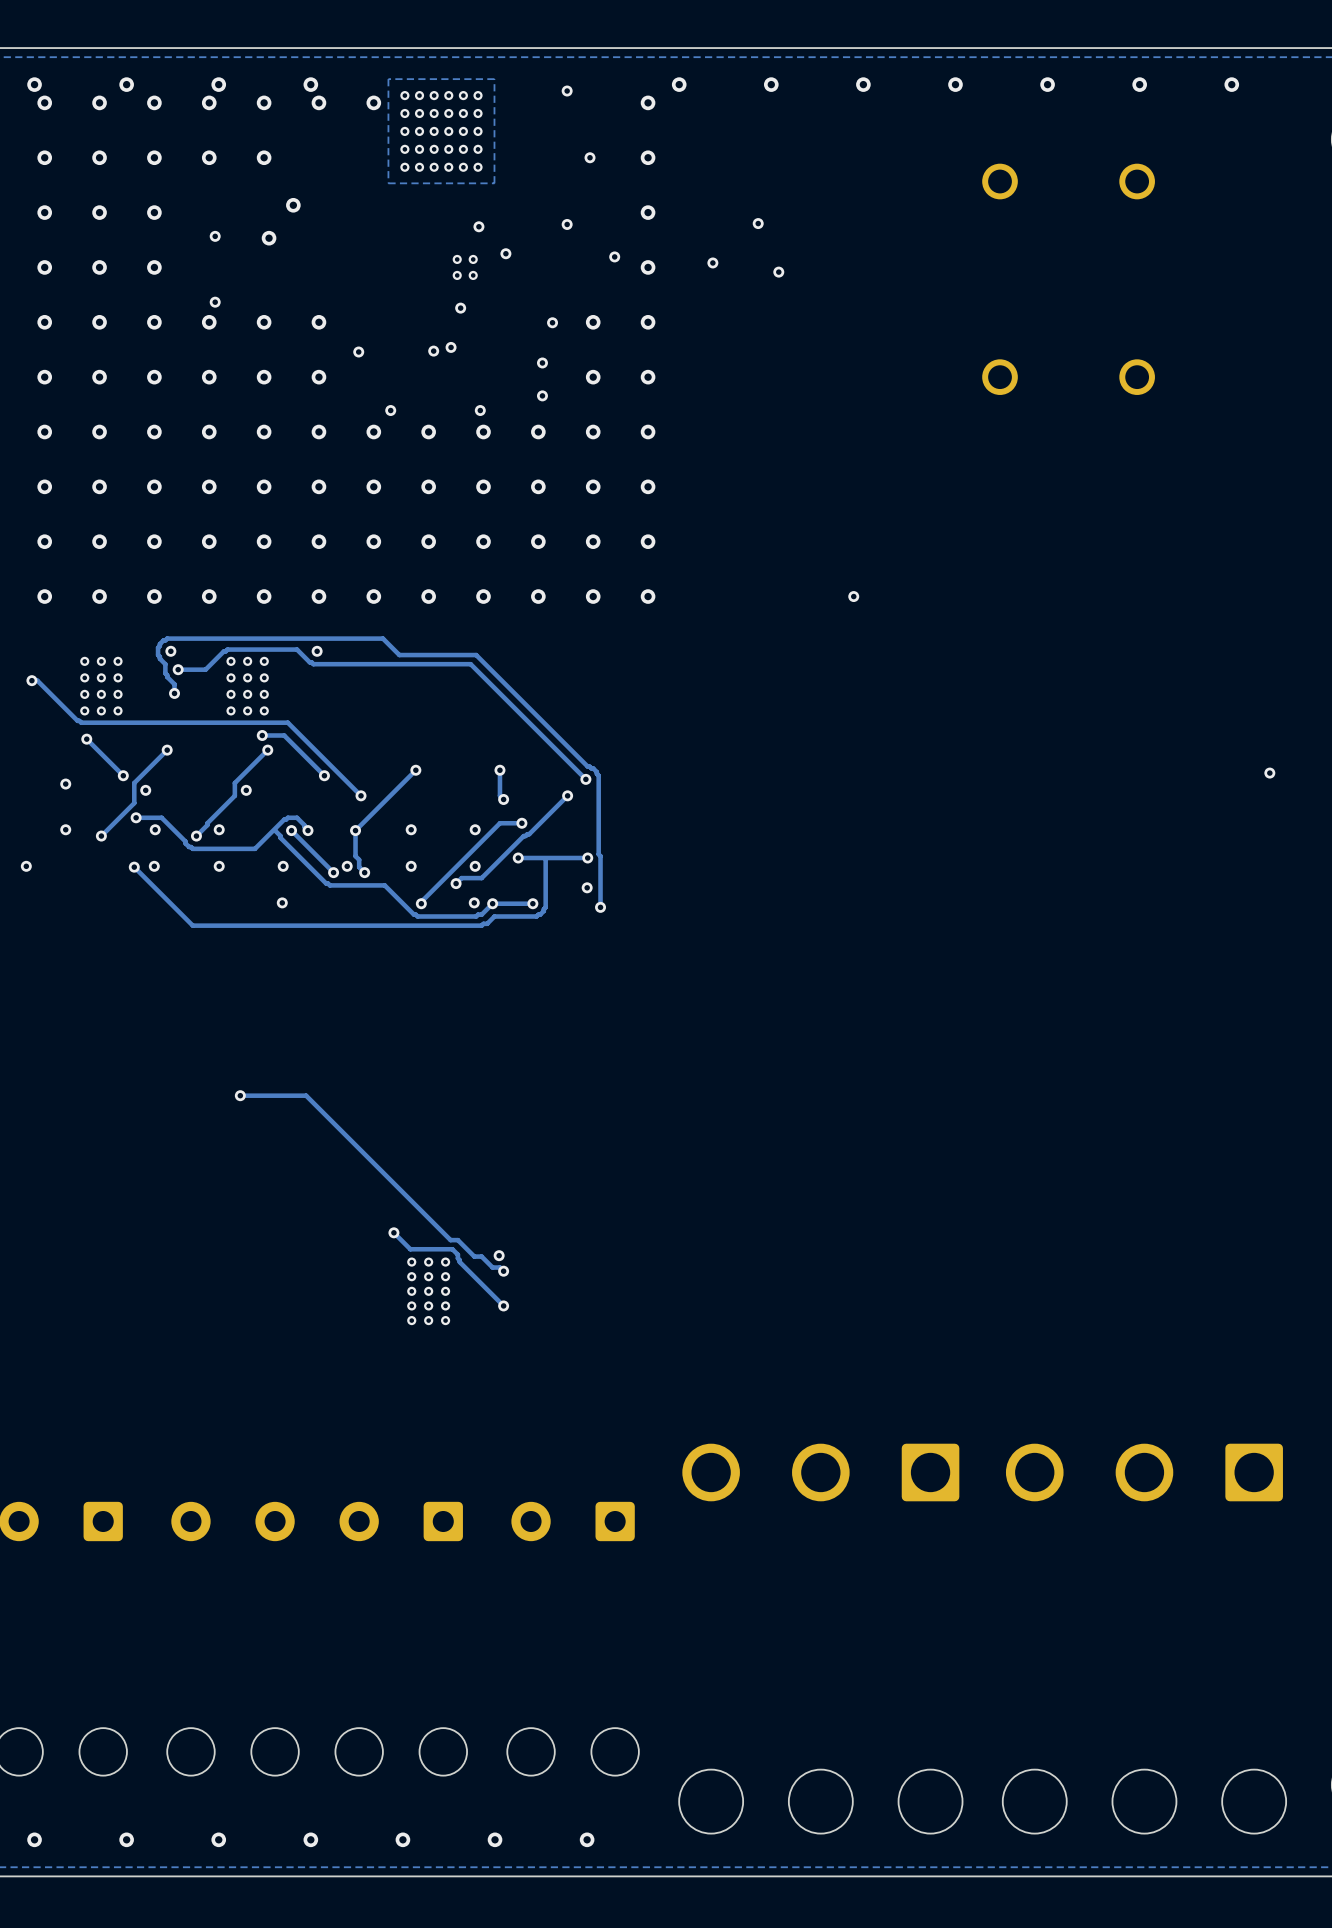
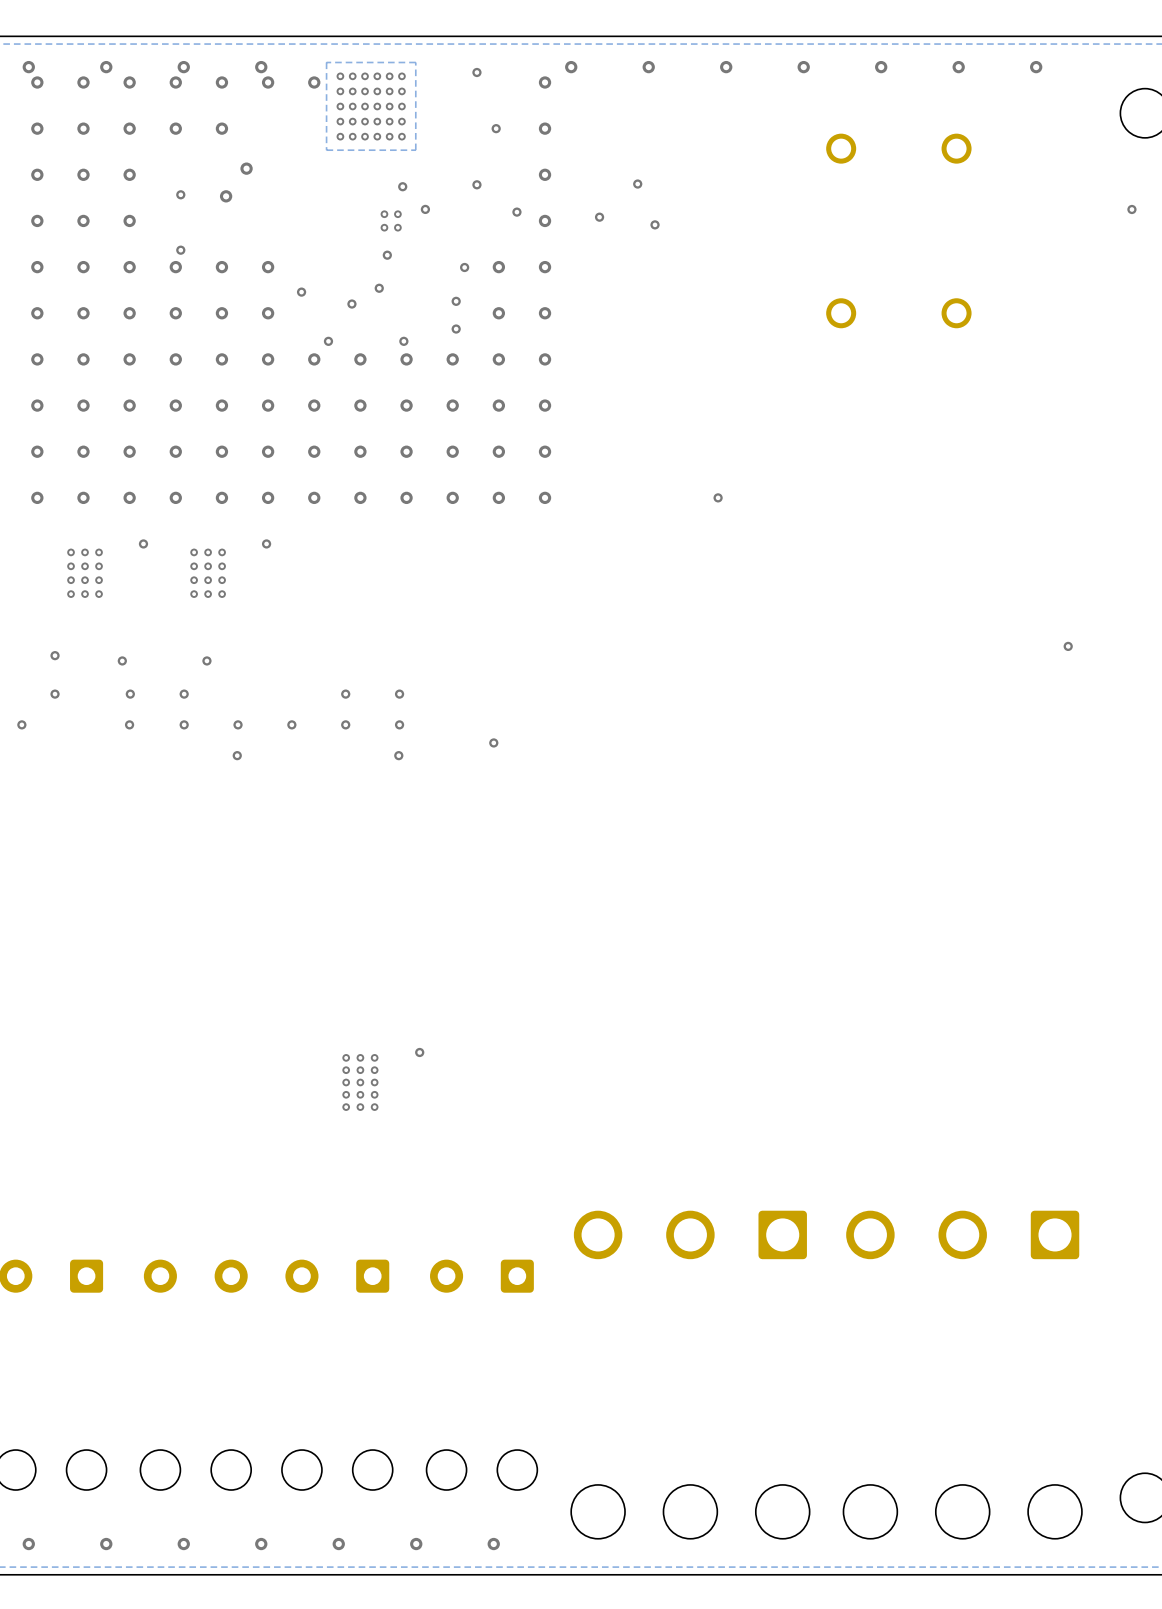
via position: (433, 351) -> (351, 304)
track: (178, 669) (205, 669) (227, 649) (297, 649) (313, 664) (470, 664) (585, 779) -> none
via: (178, 669) -> none
track: (31, 680) (37, 680) (81, 722) (287, 722) (361, 795) -> none
via: (31, 680) -> none
track: (174, 693) (174, 684) (167, 676) (165, 664) (158, 655) (159, 644) (167, 638) (382, 638) (399, 655) (476, 655) (598, 775) (600, 907) -> none
via: (174, 693) -> none
track: (262, 735) (284, 735) (324, 775) -> none
via: (262, 735) -> none
track: (86, 739) (123, 775) -> none
via: (86, 739) -> none
track: (167, 750) (134, 783) (134, 803) (101, 836) -> none
via: (167, 750) -> none
track: (267, 750) (234, 783) (234, 795) (196, 836) -> none
via: (267, 750) -> none
track: (415, 770) (355, 830) -> none
via: (415, 770) -> none
track: (499, 770) (499, 795) (503, 799) -> none
via: (499, 770) -> none
via: (123, 775) -> none
via: (324, 775) -> none
via: (585, 779) -> none
via: (361, 795) -> none
track: (567, 795) (481, 878) (461, 878) (456, 883) -> none
via: (567, 795) -> none
via: (503, 799) -> none
track: (136, 817) (161, 817) (192, 848) (254, 848) (287, 817) (297, 817) (307, 830) -> none
via: (136, 817) -> none
track: (521, 823) (499, 823) (421, 903) -> none
via: (521, 823) -> none
track: (275, 830) (326, 883) (329, 885) (384, 885) (417, 916) (476, 916) (481, 914) (492, 903) -> none
track: (291, 830) (333, 872) -> none
via: (291, 830) -> none
via: (307, 830) -> none
via: (355, 830) -> none
via: (101, 836) -> none
via: (196, 836) -> none
track: (355, 836) (355, 856) (359, 859) (359, 867) (364, 872) -> none
via: (518, 858) -> none
track: (587, 858) (518, 858) -> none
via: (587, 858) -> none
track: (545, 859) (545, 907) (543, 911) (536, 916) (494, 916) (487, 923) (481, 925) (192, 925) (134, 867) -> none
via: (134, 867) -> none
via: (333, 872) -> none
via: (364, 872) -> none
via: (456, 883) -> none
via: (421, 903) -> none
via: (492, 903) -> none
track: (532, 903) (498, 903) -> none
via: (532, 903) -> none
via: (600, 907) -> none
track: (240, 1095) (306, 1095) (450, 1240) (457, 1240) (474, 1256) (481, 1256) (492, 1267) (499, 1267) (503, 1271) -> none
via: (240, 1095) -> none
track: (393, 1232) (410, 1249) (452, 1249) (457, 1254) (459, 1262) (503, 1305) -> none
via: (393, 1232) -> none
via: (503, 1271) -> none
via: (503, 1305) -> none

